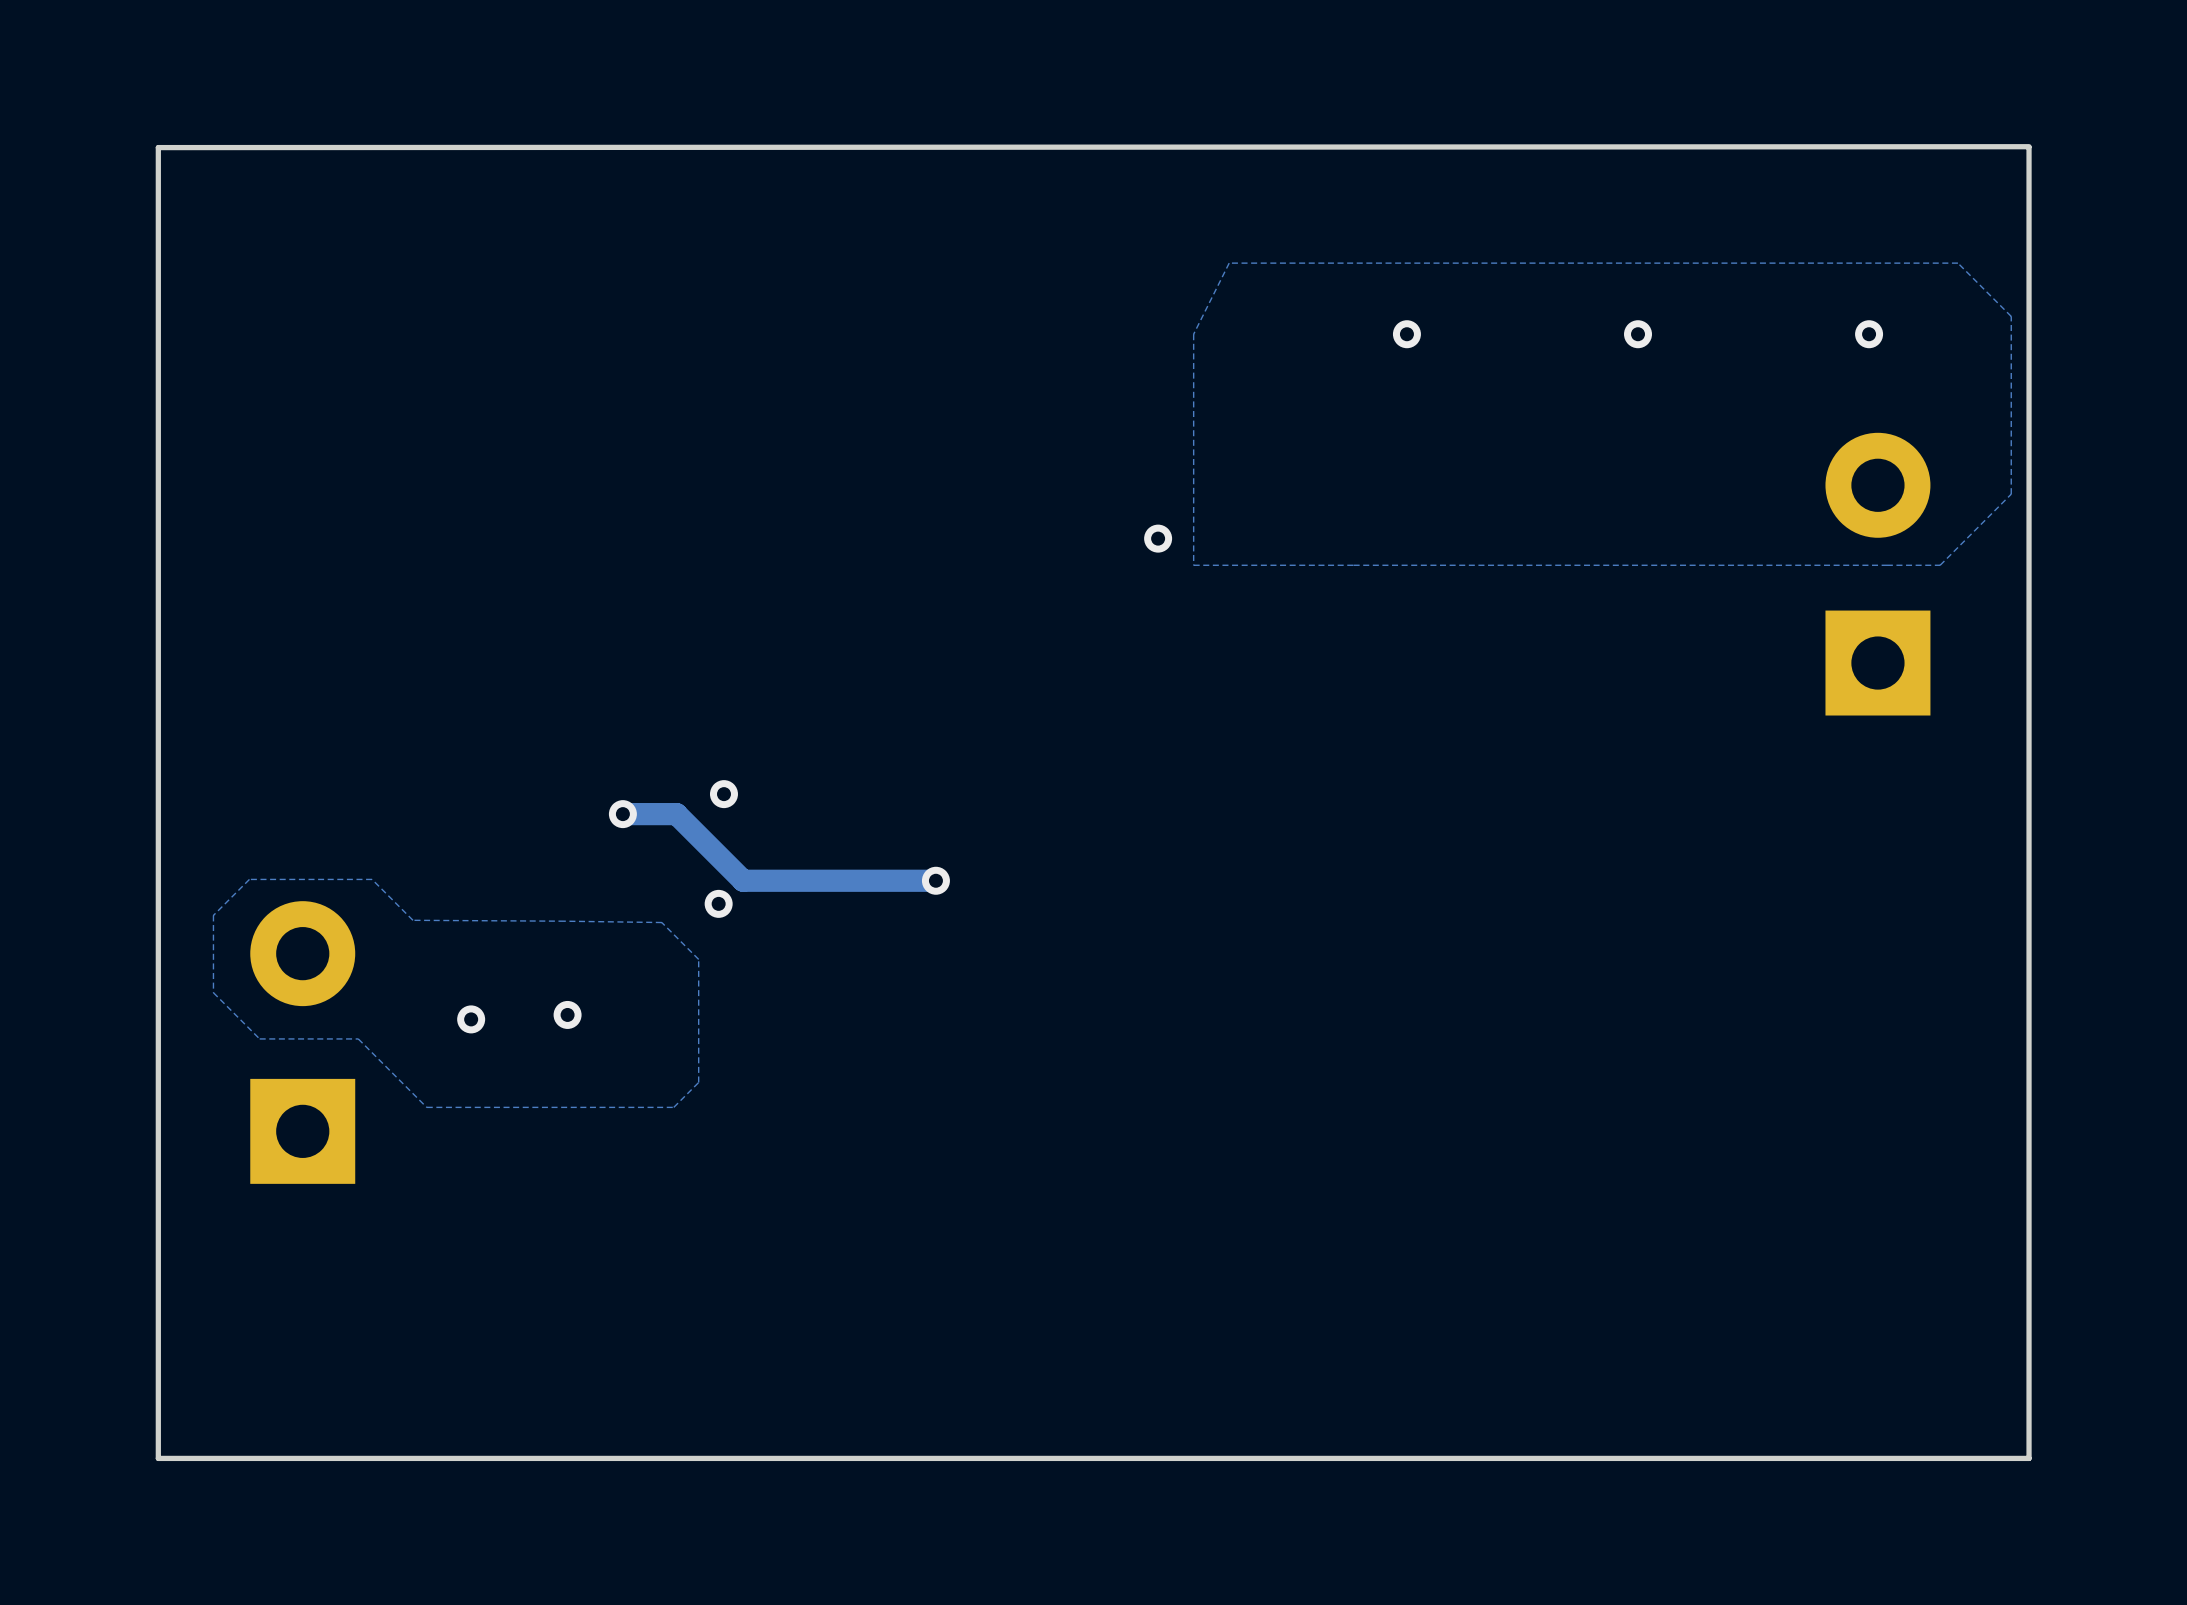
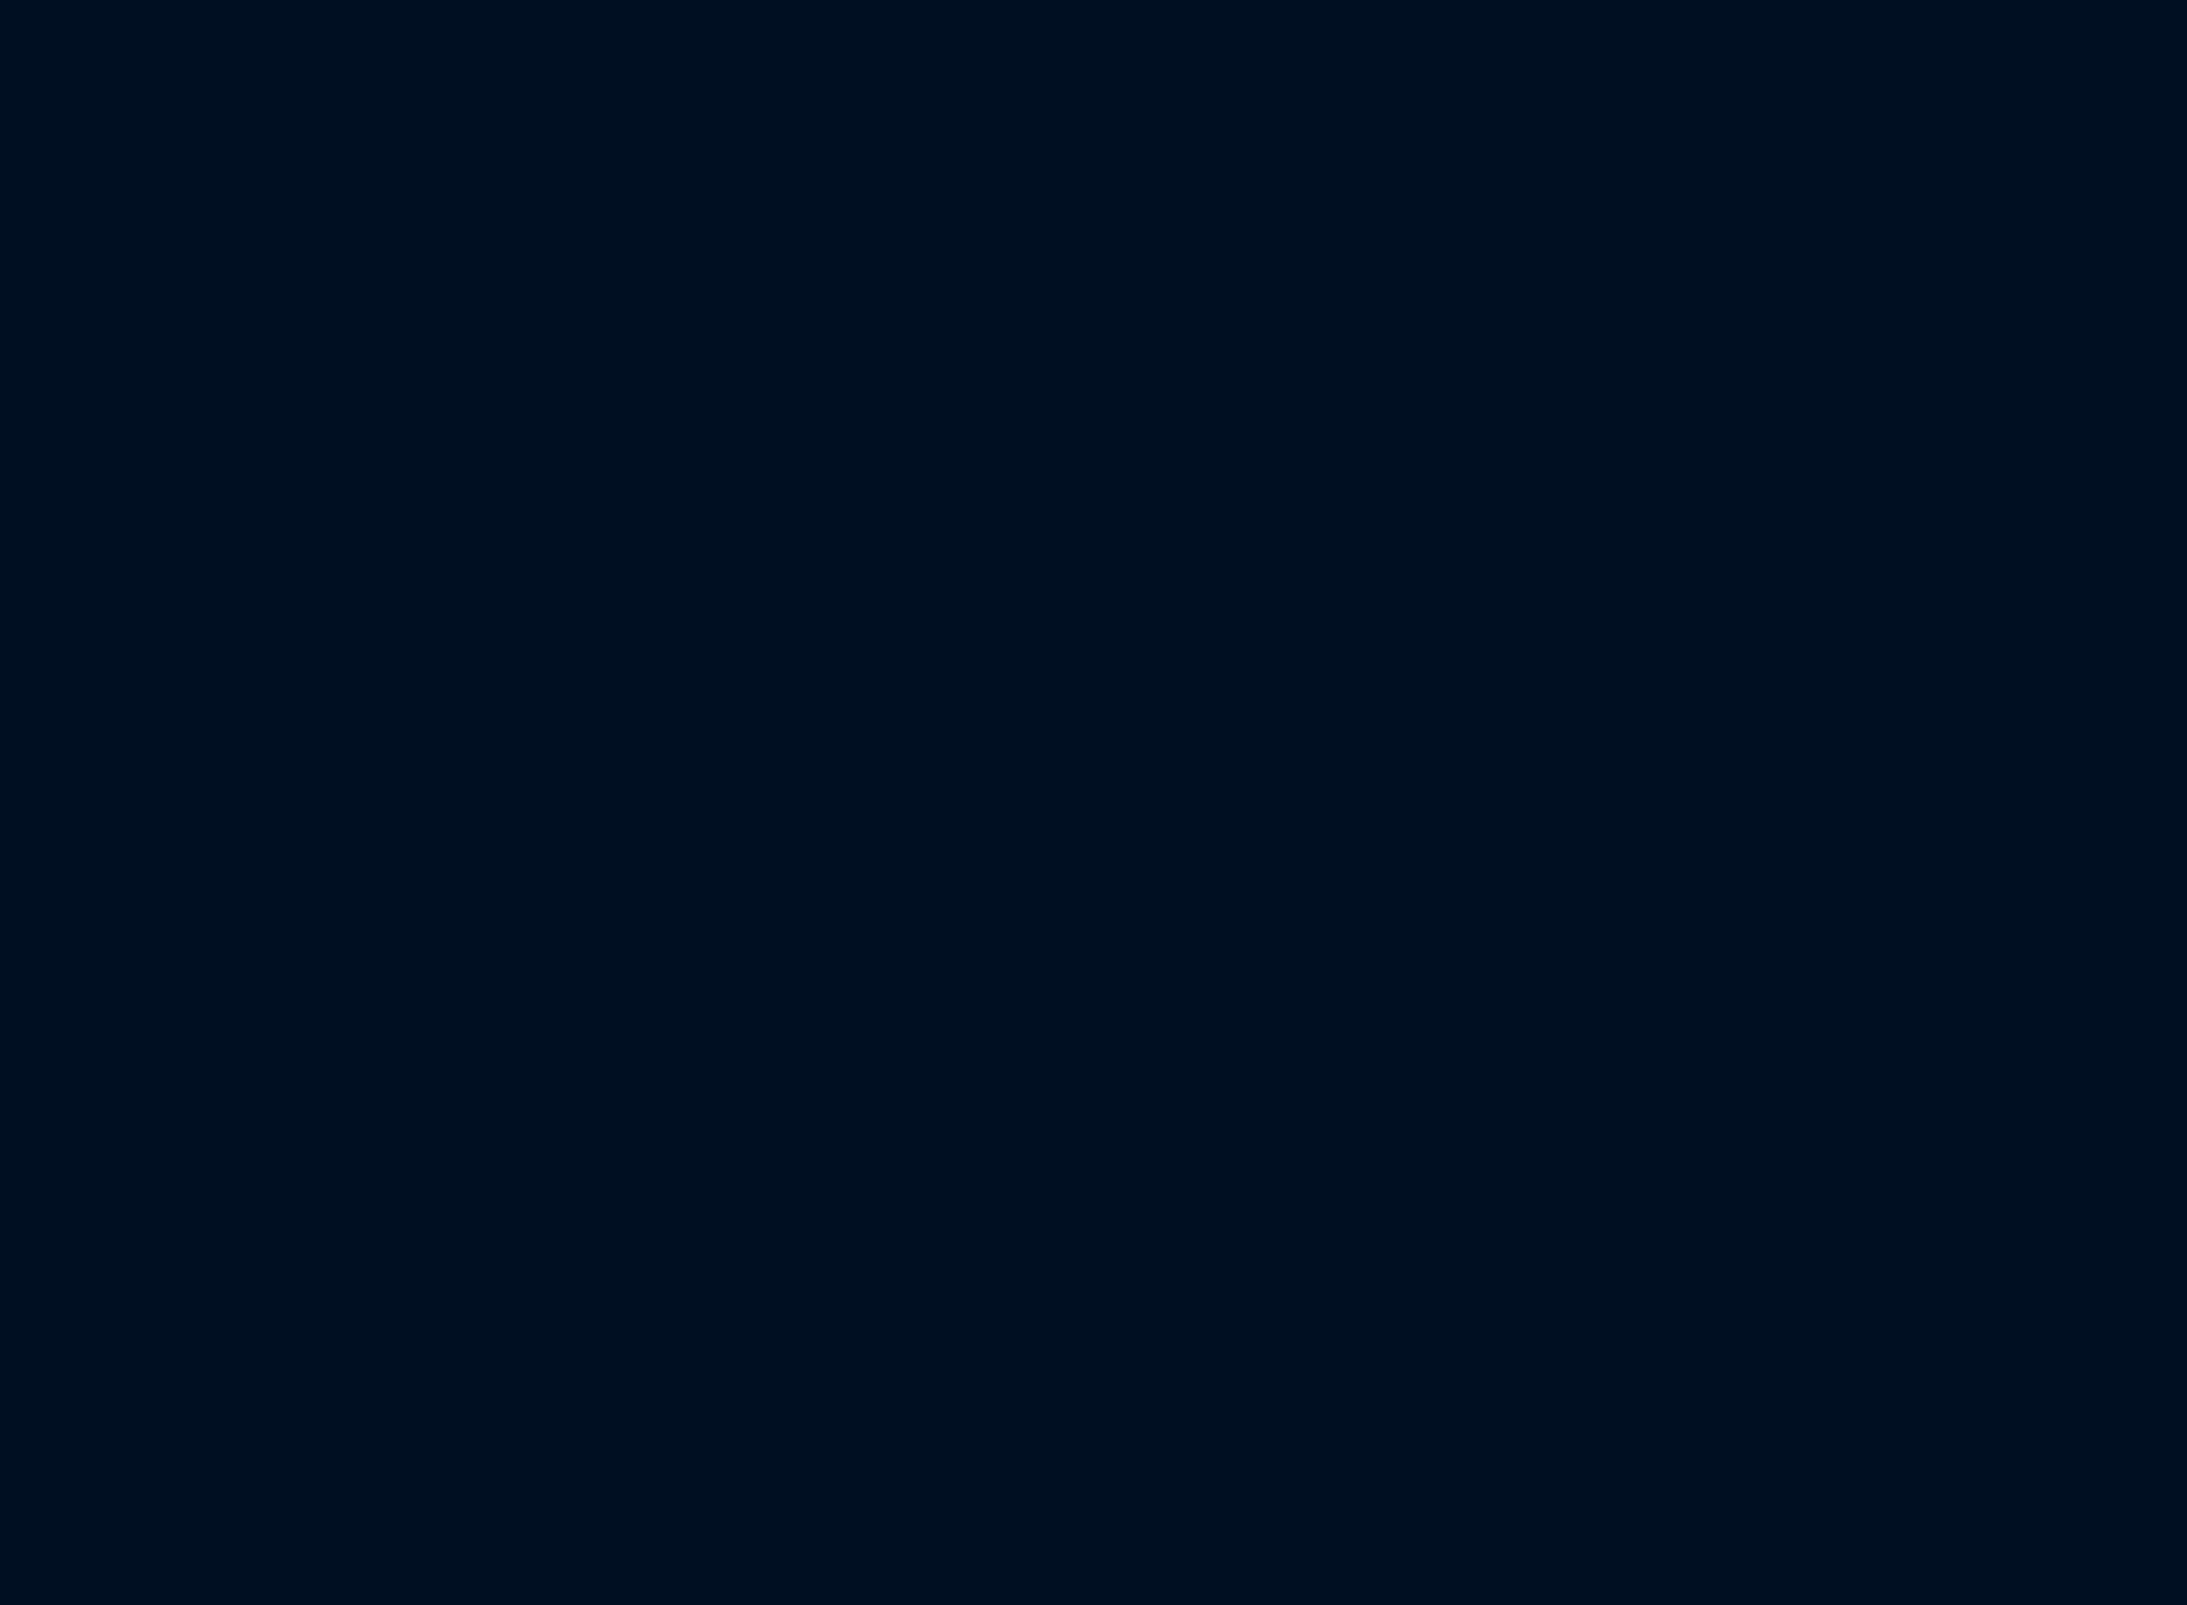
board edge: (2029, 146) (158, 147) (158, 1458) (2029, 1458) (2029, 147) -> none
zone outline: (1957, 263) (2011, 316) (2011, 494) (1940, 565) (1193, 565) (1193, 334) (1229, 263) (1957, 263) -> none
via: (1406, 334) -> none
via: (1638, 334) -> none
via: (1869, 334) -> none
via: (1158, 538) -> none
part: (1877, 574) -> none
via: (723, 794) -> none
track: (622, 814) (676, 814) (743, 880) (935, 880) -> none
via: (622, 814) -> none
zone outline: (372, 879) (412, 920) (661, 922) (698, 959) (698, 1082) (673, 1107) (426, 1107) (358, 1038) (259, 1038) (213, 992) (213, 915) (249, 879) (372, 879) -> none
via: (935, 880) -> none
via: (718, 903) -> none
via: (567, 1014) -> none
via: (471, 1019) -> none
part: (302, 1042) -> none

